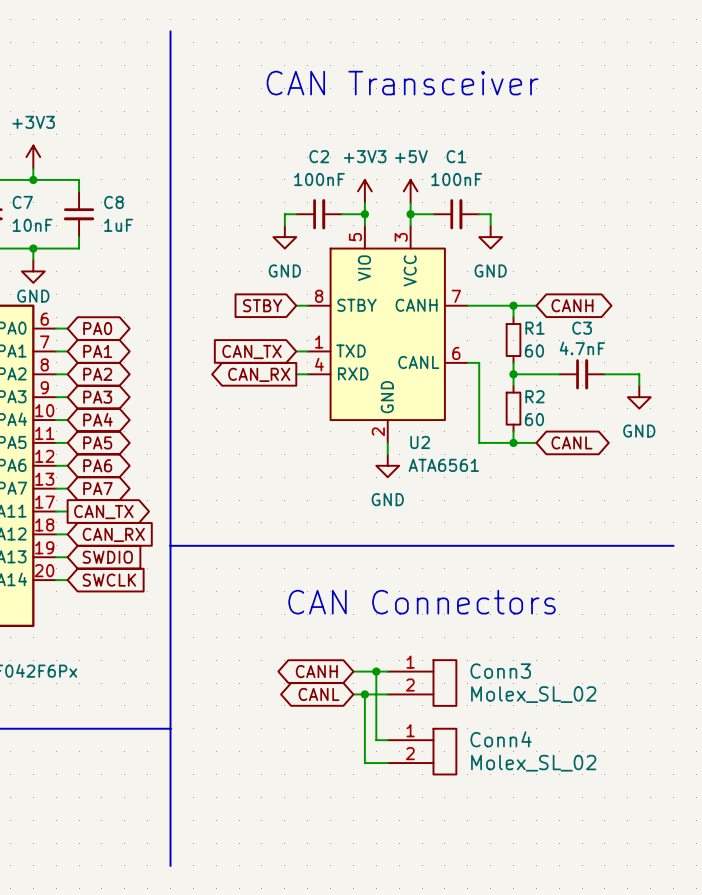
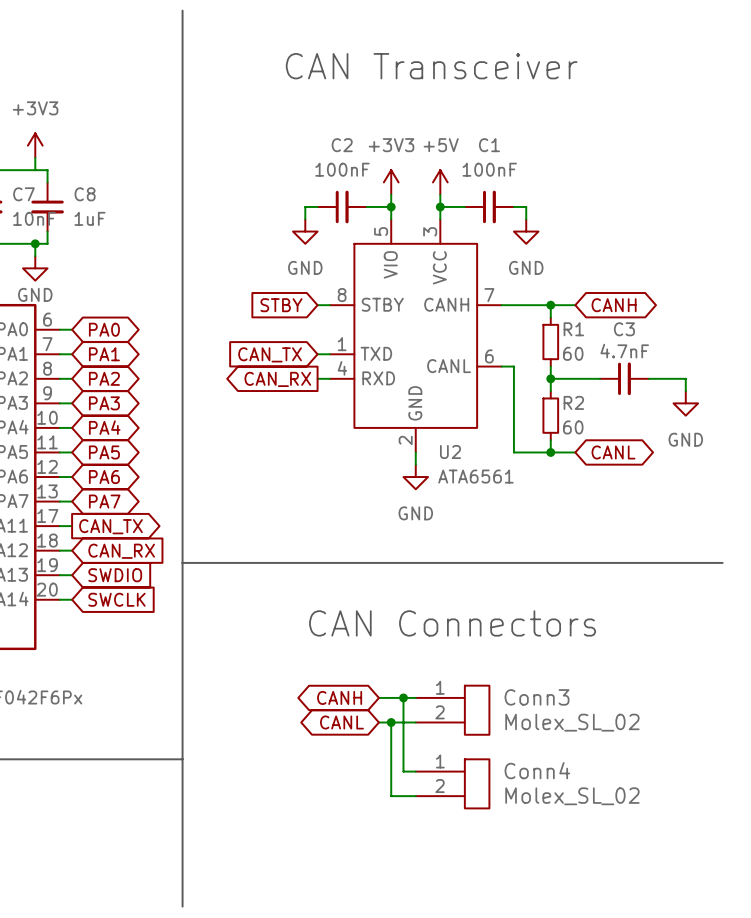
junction: (33, 179) -> none
wire: (44, 179) (79, 179) (79, 191) -> (47, 170) (47, 182)
C8 position: (79, 214) -> (47, 206)
wire: (79, 237) (79, 248) (44, 248) -> (47, 231) (47, 243)

